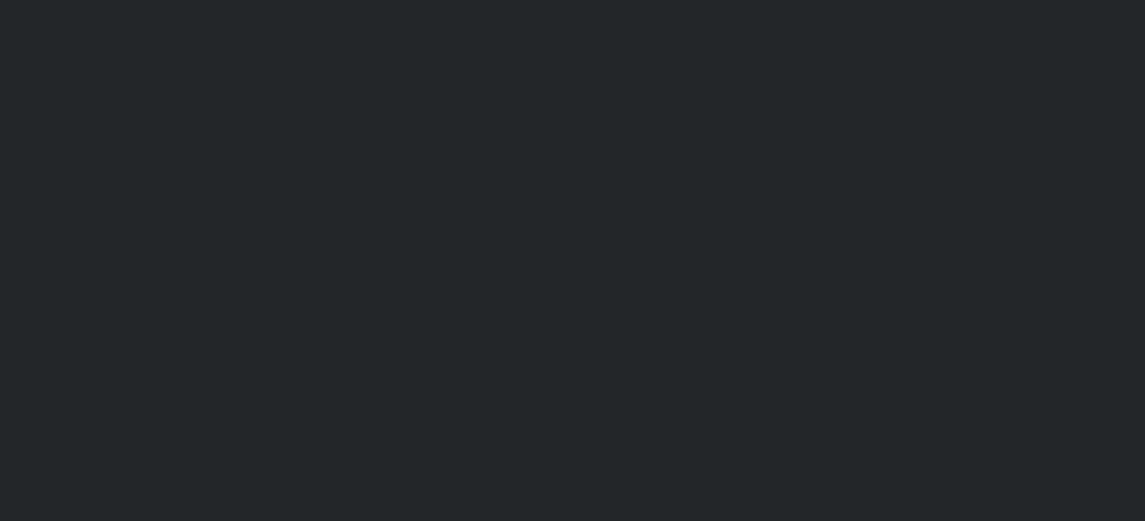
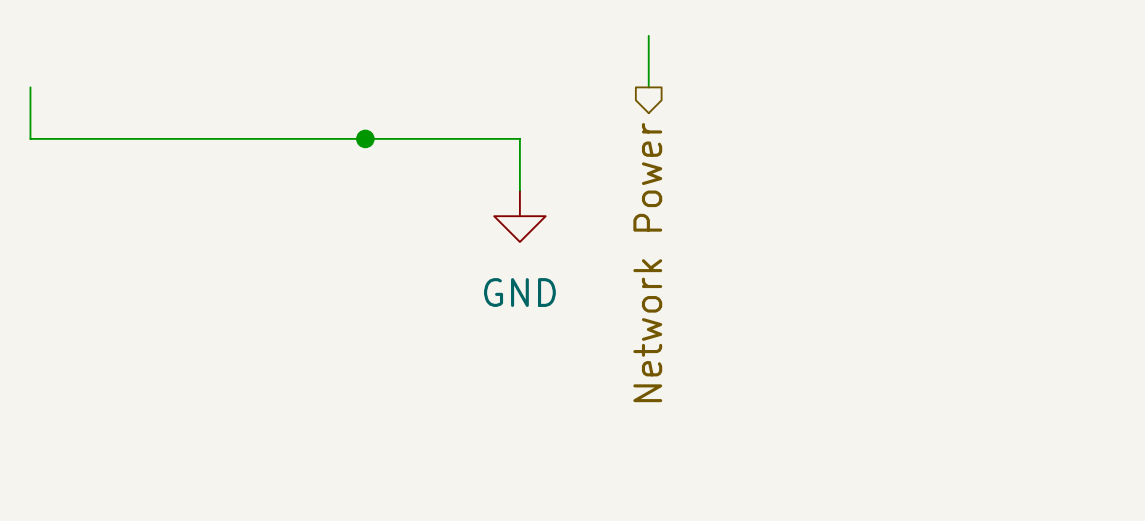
wire: none -> (648, 35) (648, 87)
wire: none -> (30, 87) (30, 138) (519, 138) (519, 190)
junction: none -> (365, 138)
power symbol: none -> GND (519, 216)
hierarchical label: none -> Network Power (647, 262)

